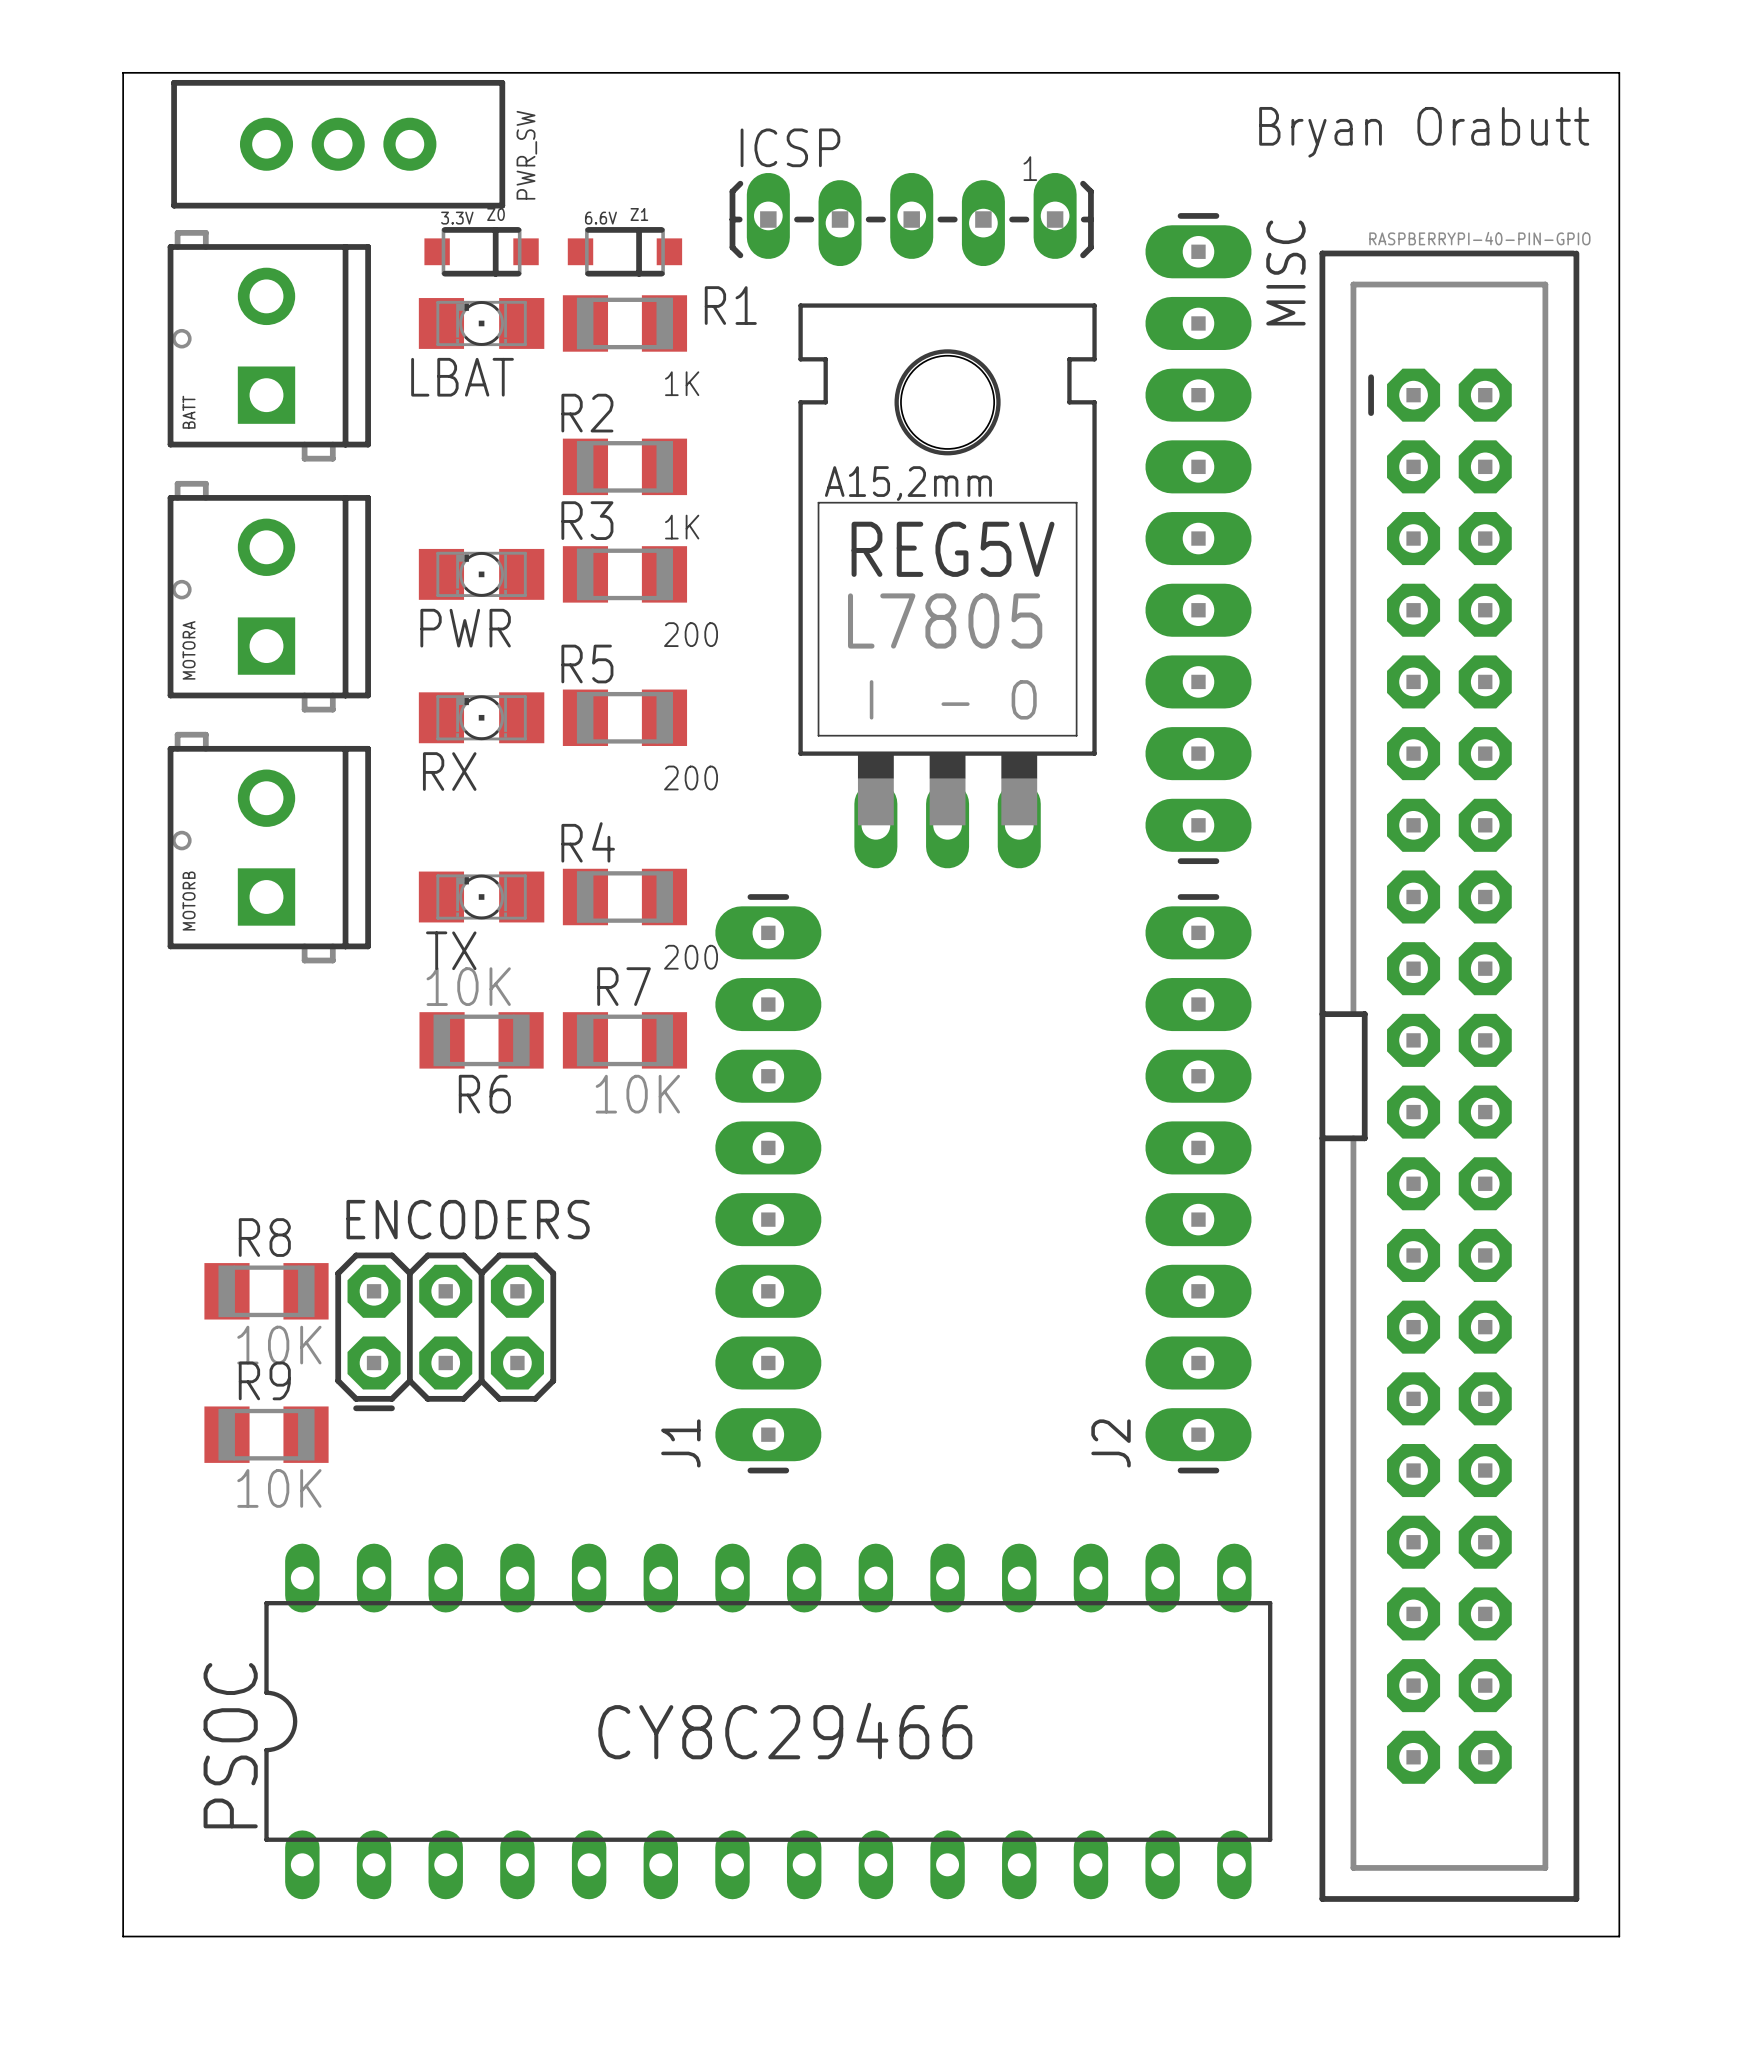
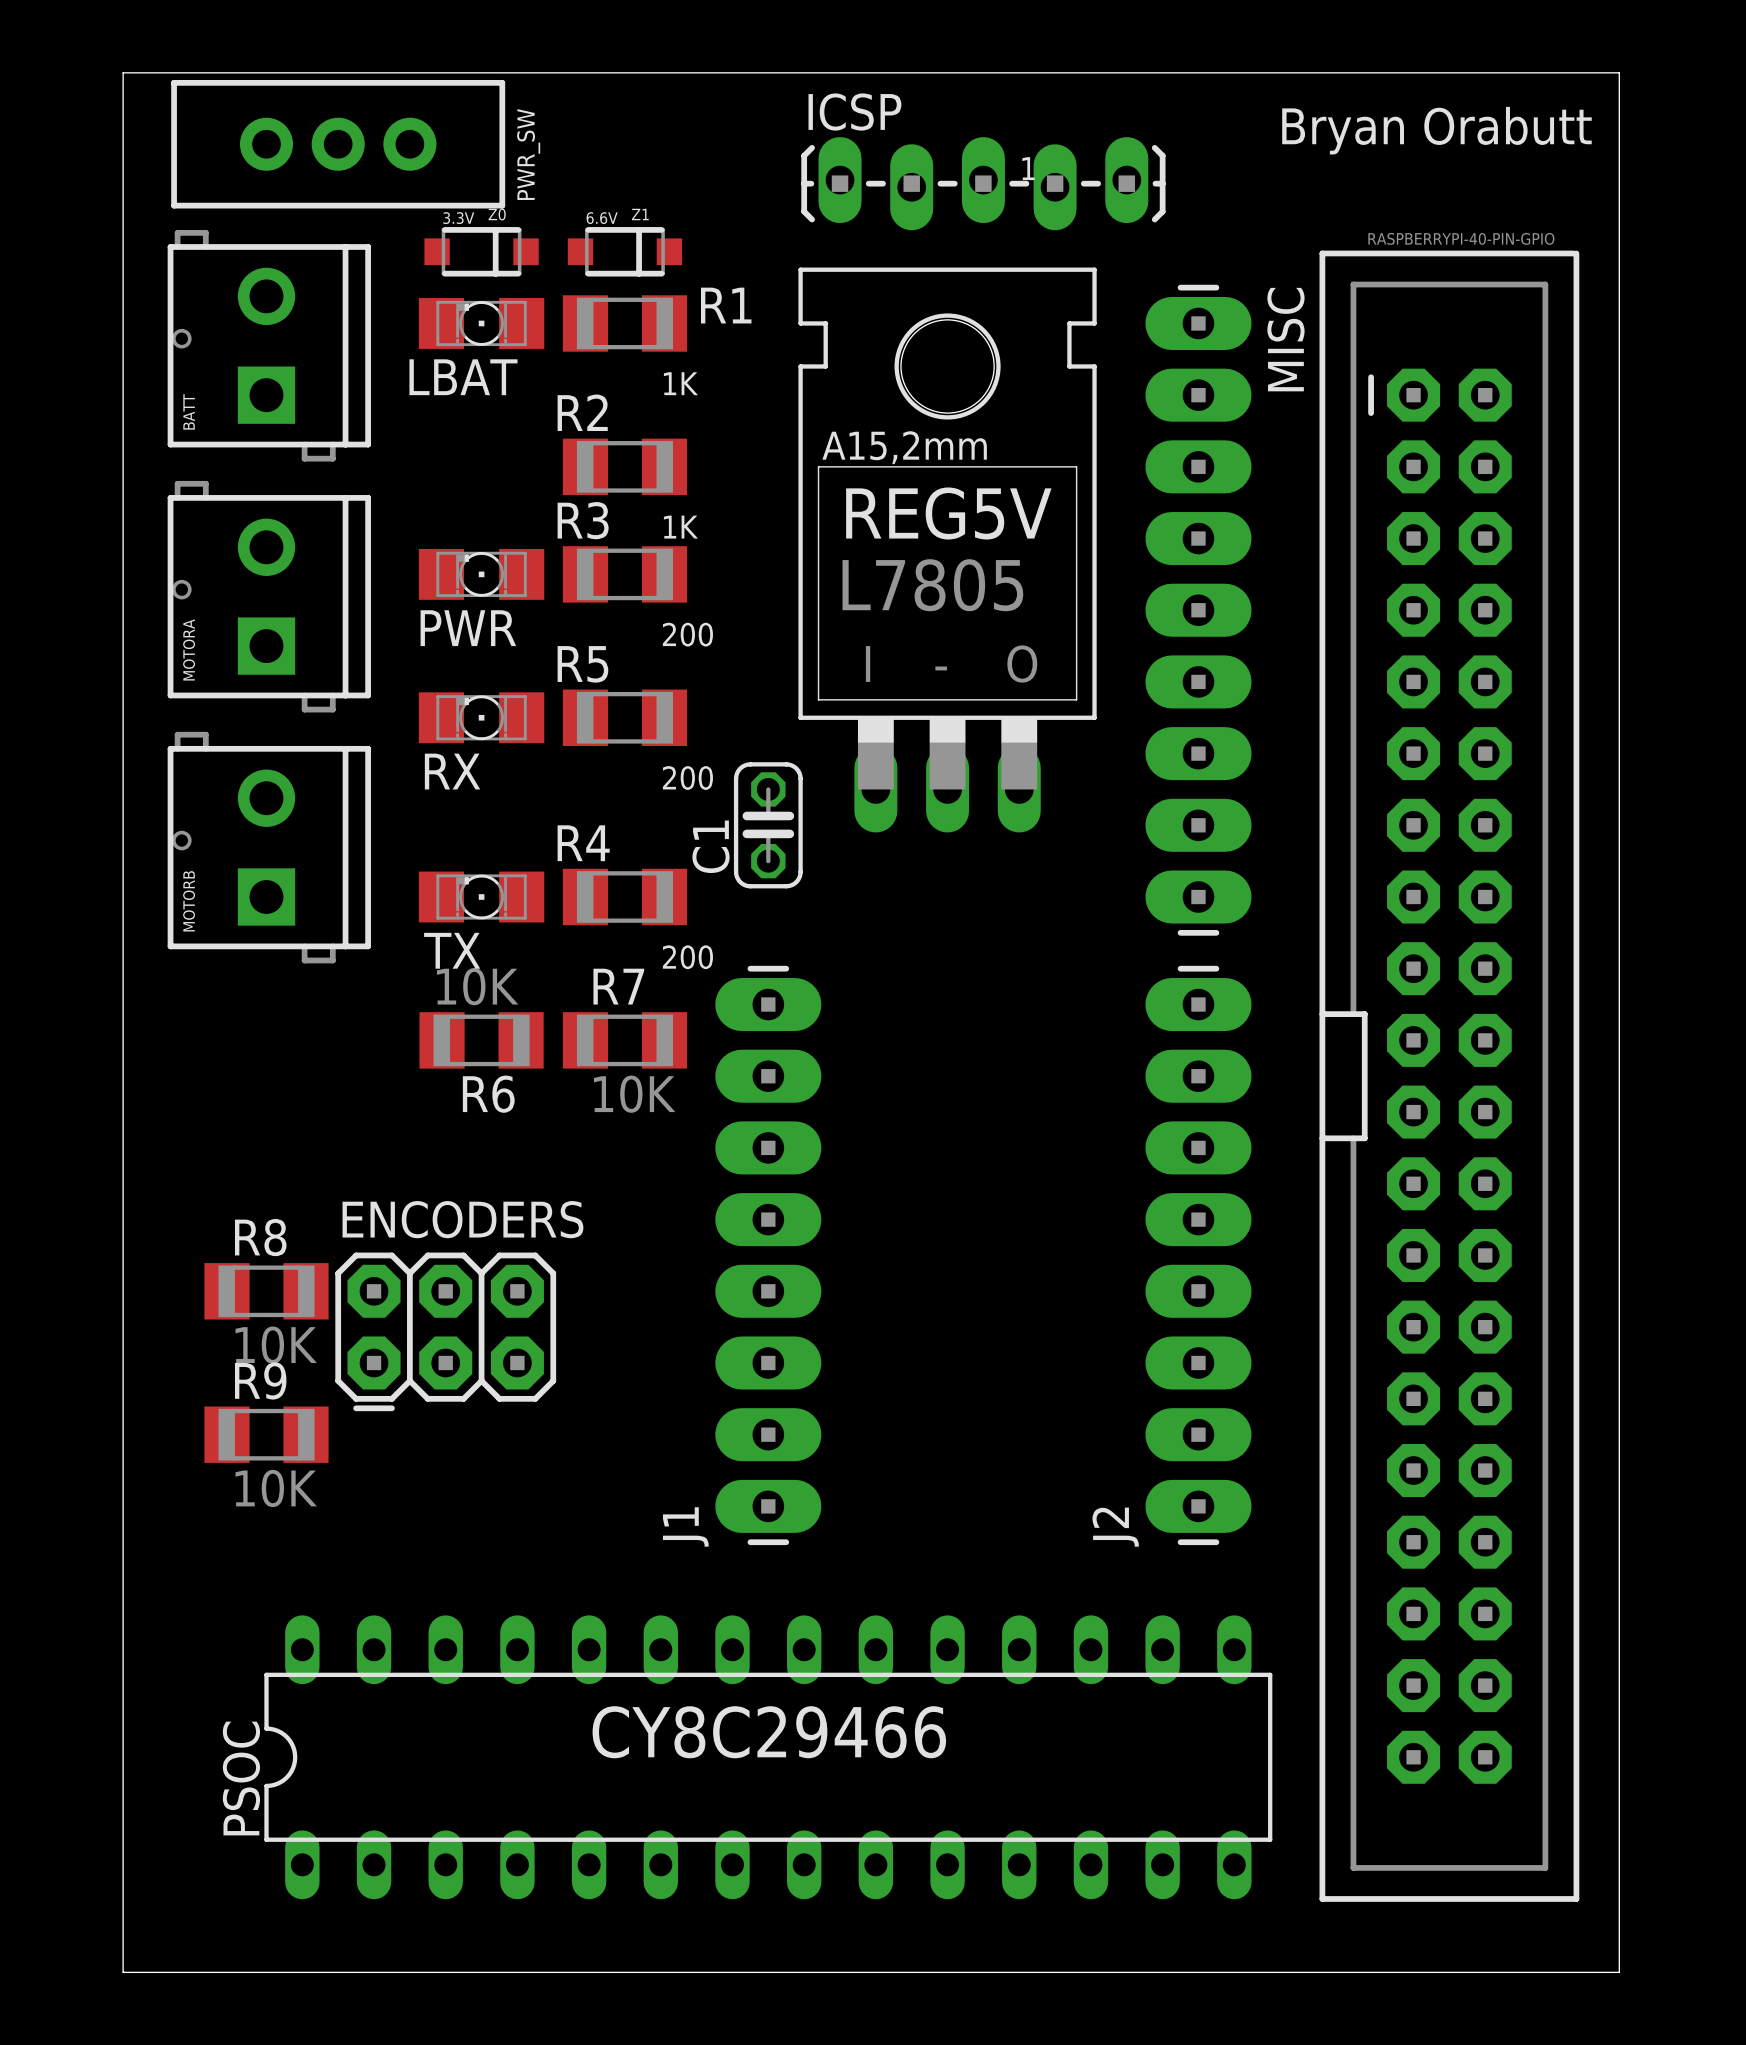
ICSP position: (911, 219) -> (983, 183)
MISC position: (1198, 538) -> (1198, 610)
REG5V position: (947, 585) -> (947, 550)
C1: none -> (768, 825)
J1 position: (768, 1183) -> (768, 1255)
J2 position: (1198, 1183) -> (1198, 1255)
PSOC: (768, 1721) -> none
PSOC: none -> (768, 1757)
board edge: (123, 1936) (1619, 1936) -> (123, 1936) (123, 1972) (1619, 1972) (1619, 1936)

